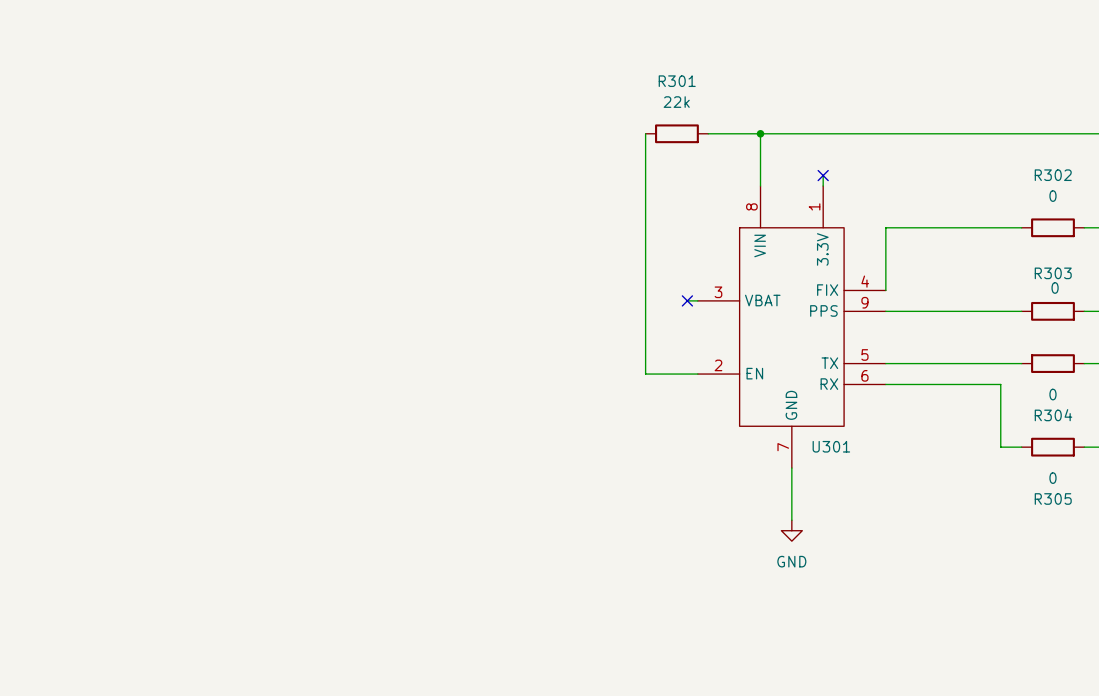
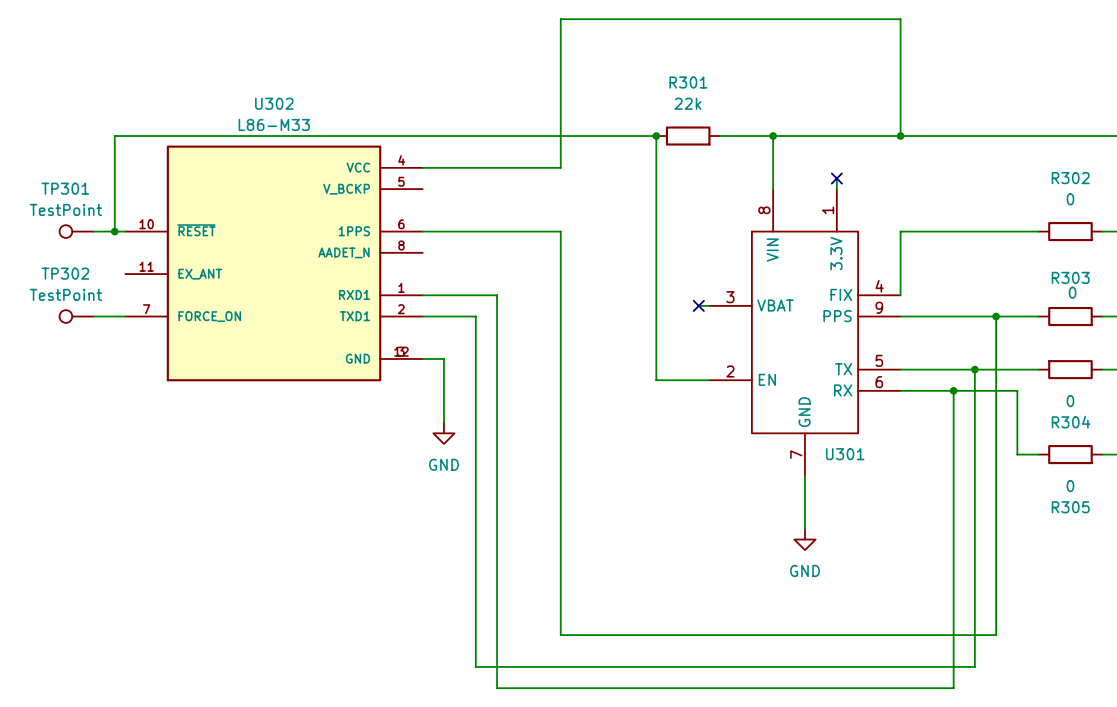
wire: none -> (656, 136) (114, 136) (114, 231)
junction: none -> (656, 136)
wire: none -> (900, 136) (900, 19) (560, 19) (560, 167) (422, 167)
junction: none -> (900, 136)
TP301: none -> TestPoint (76, 231)
wire: none -> (93, 231) (125, 231)
junction: none -> (114, 231)
wire: none -> (422, 231) (560, 231) (560, 635) (996, 635) (996, 316)
U302: none -> L86-M33 (274, 263)
wire: none -> (422, 295) (497, 295) (497, 688) (953, 688) (953, 390)
TP302: none -> TestPoint (76, 316)
wire: none -> (93, 316) (125, 316)
wire: none -> (422, 316) (475, 316) (475, 666) (974, 666) (974, 369)
junction: none -> (996, 316)
wire: none -> (422, 359) (443, 359) (443, 422)
junction: none -> (974, 369)
junction: none -> (953, 390)
power symbol: none -> GND (443, 433)

